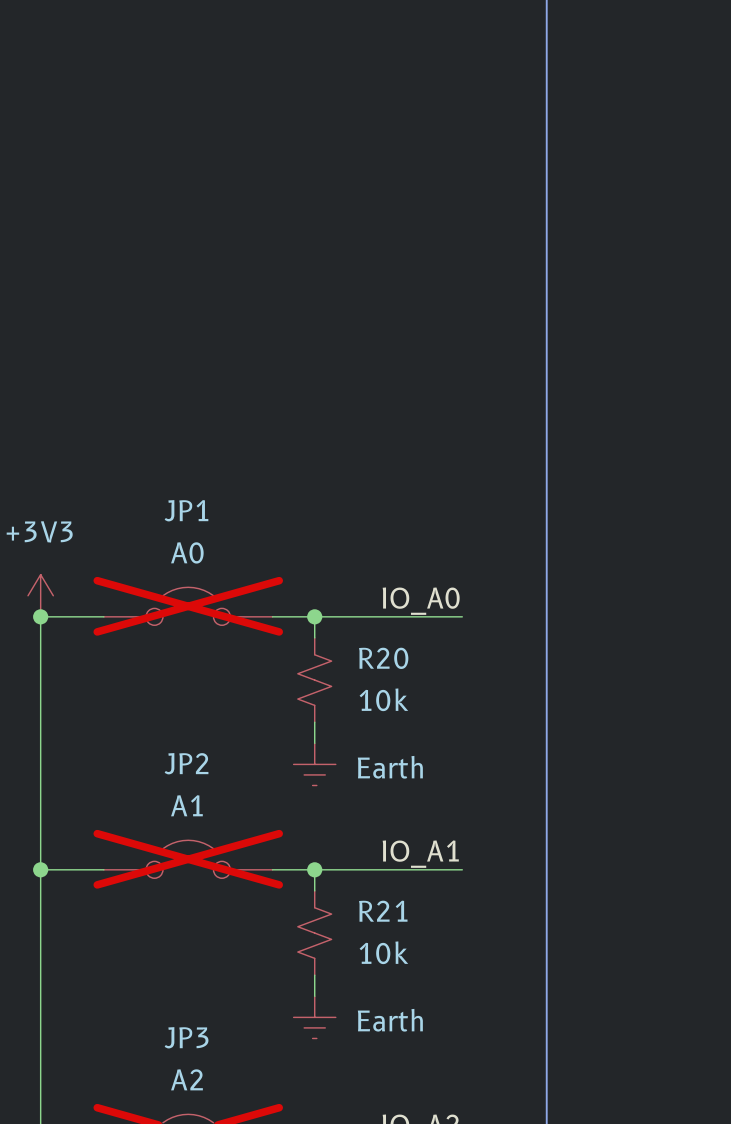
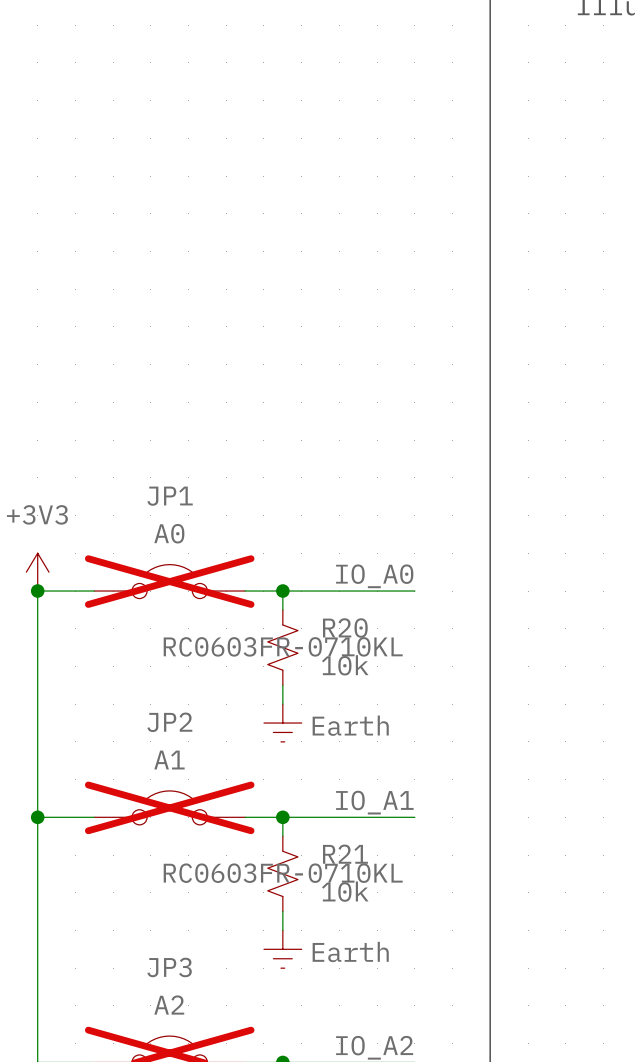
R20 text: none -> RC0603FR-0710KL (283, 646)
R21 text: none -> RC0603FR-0710KL (283, 873)

